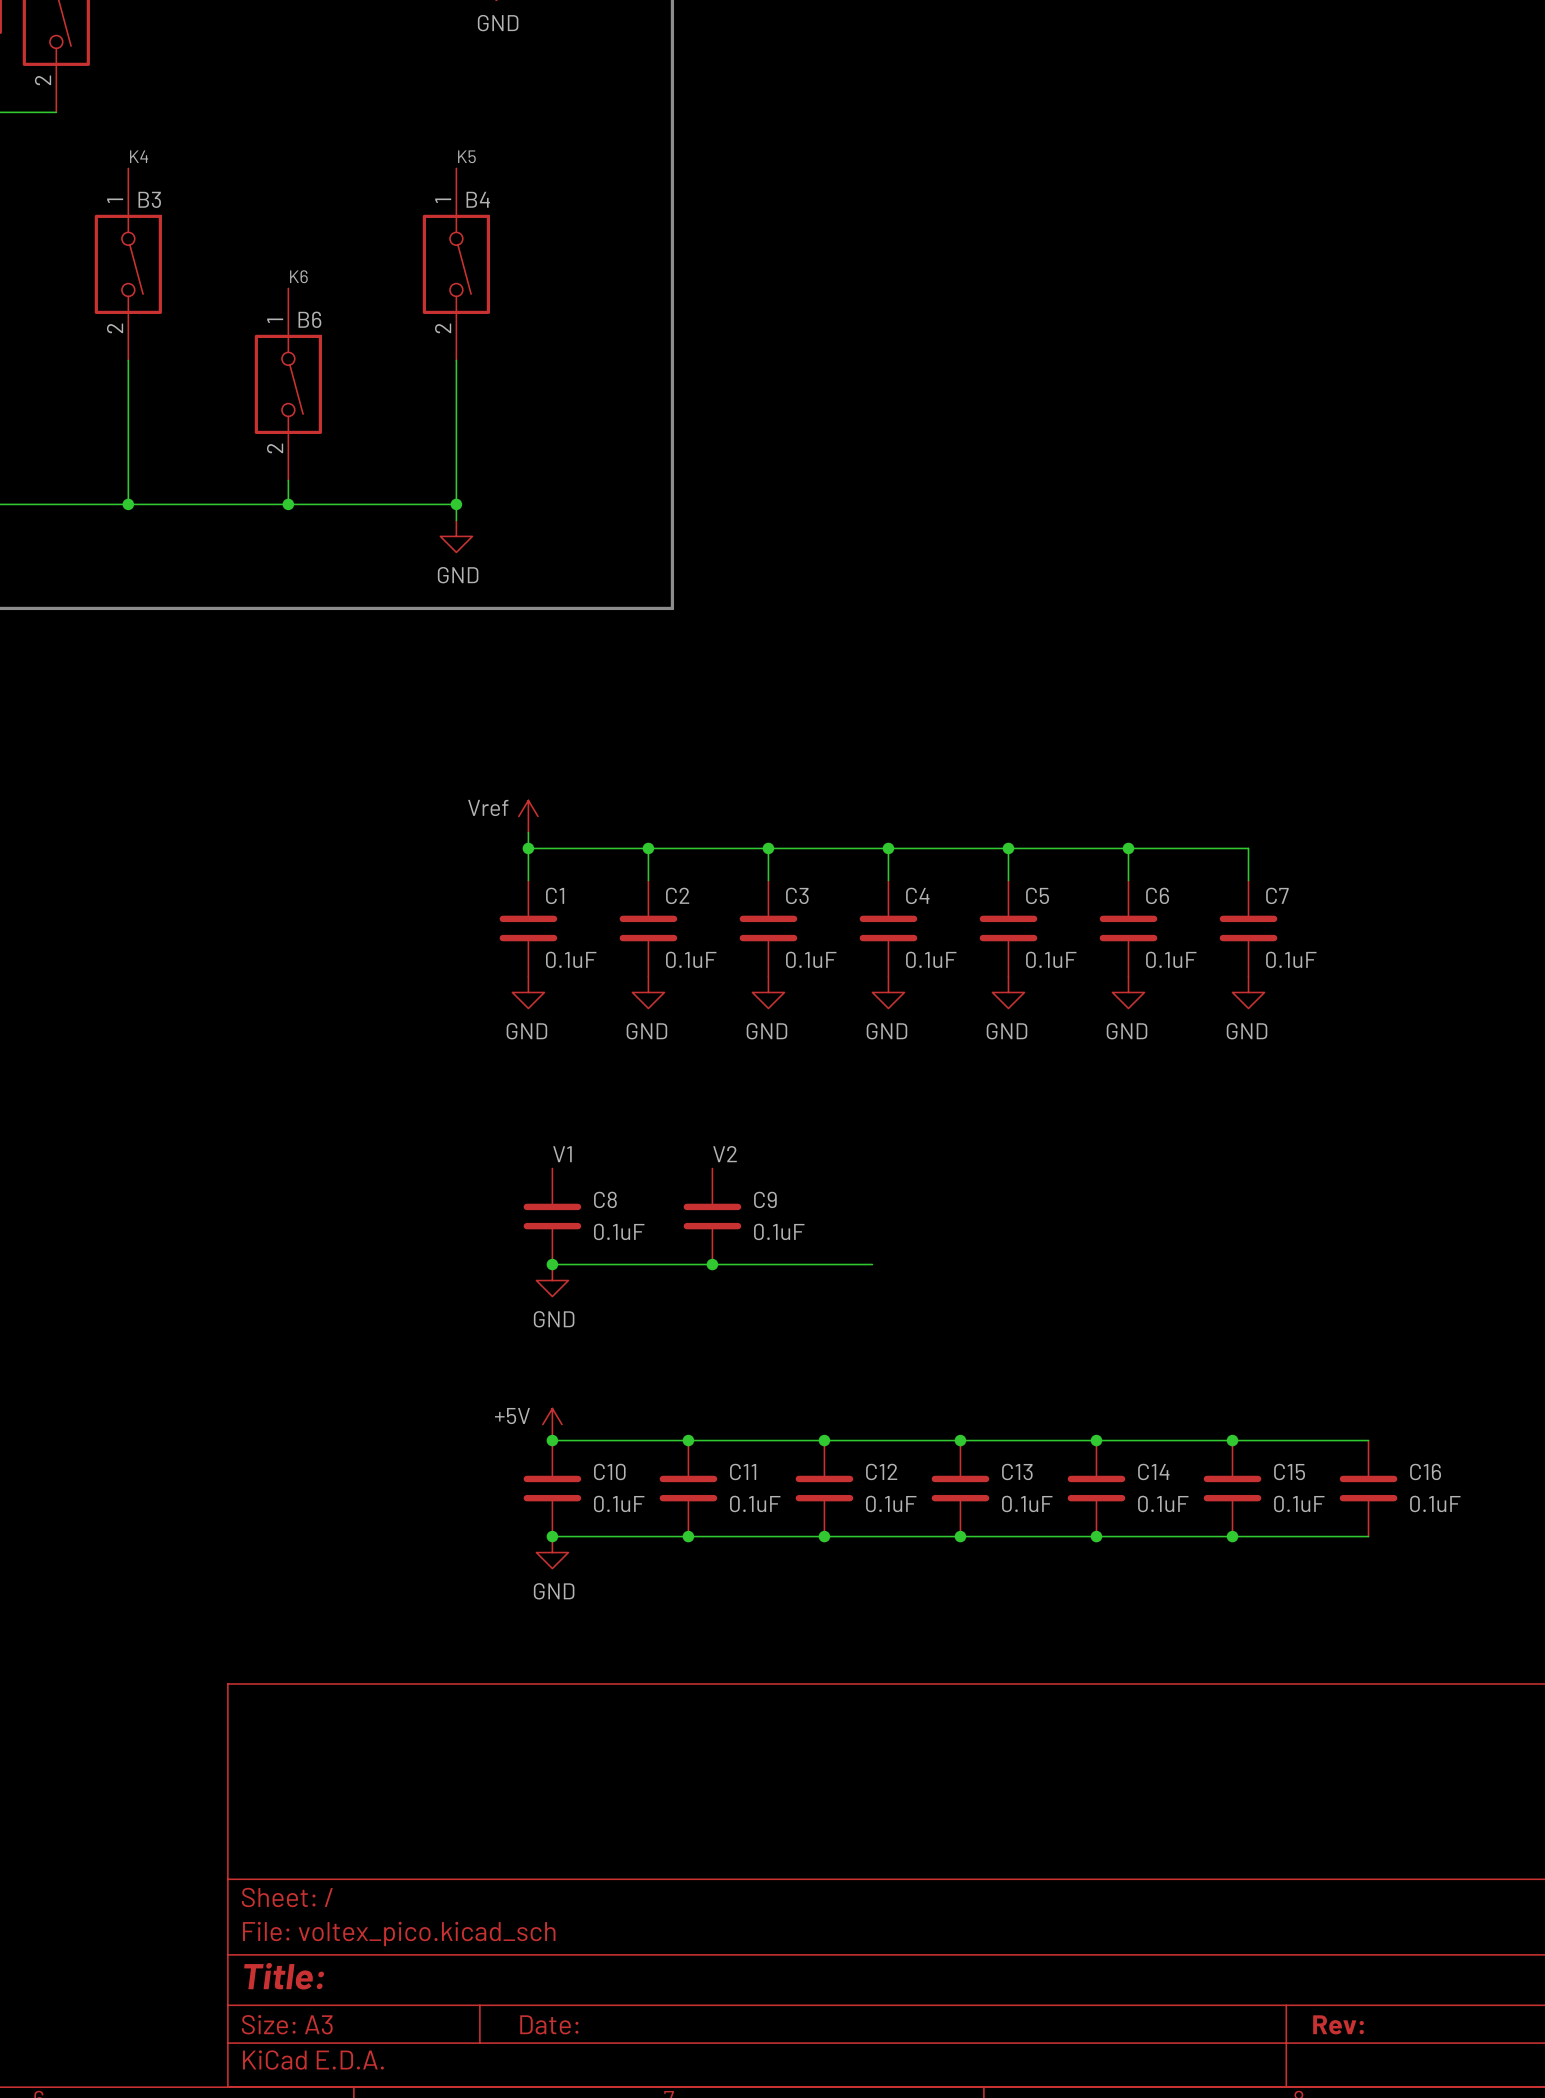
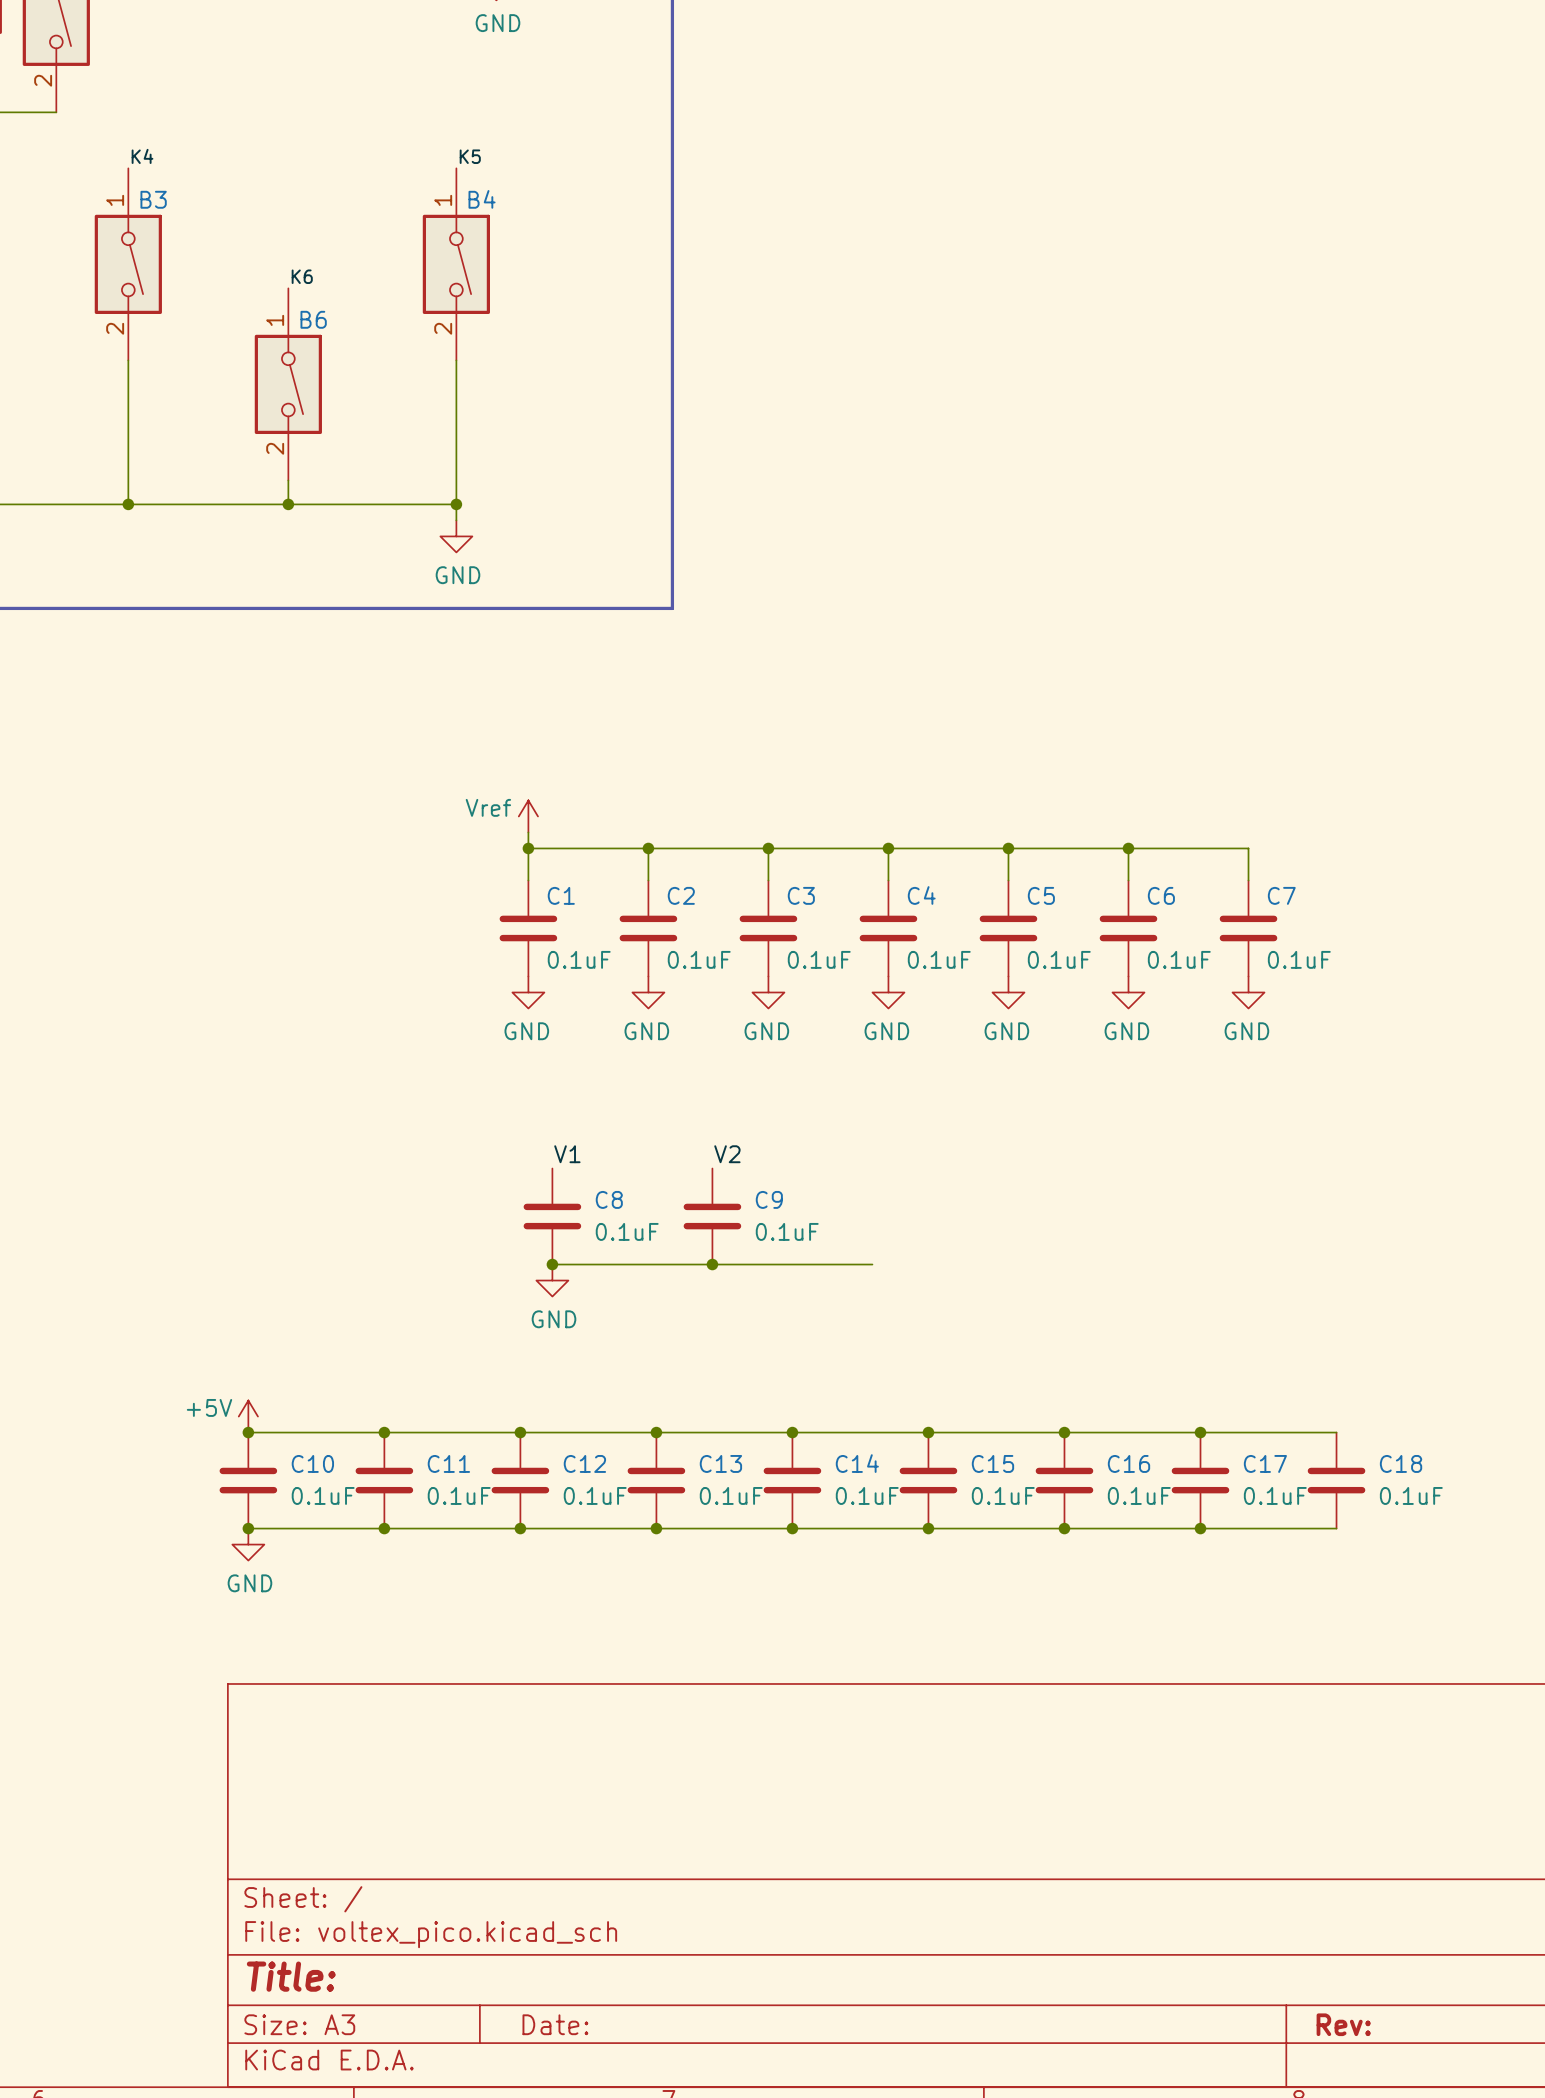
power symbol position: +5V (552, 1424) -> +5V (248, 1416)
wire: none -> (248, 1432) (1336, 1432)
junction: none -> (248, 1432)
junction: none -> (384, 1432)
wire: (552, 1440) (1368, 1440) -> none
junction position: (552, 1440) -> (520, 1432)
junction position: (688, 1440) -> (656, 1432)
junction position: (824, 1440) -> (792, 1432)
junction position: (960, 1440) -> (928, 1432)
junction position: (1096, 1440) -> (1064, 1432)
junction position: (1232, 1440) -> (1200, 1432)
C17: none -> 0.1uF (1200, 1480)
C18: none -> 0.1uF (1336, 1480)
C10 position: (552, 1488) -> (248, 1480)
C11 position: (688, 1488) -> (384, 1480)
C12 position: (824, 1488) -> (520, 1480)
C13 position: (960, 1488) -> (656, 1480)
C14 position: (1096, 1488) -> (792, 1480)
C15 position: (1232, 1488) -> (928, 1480)
C16 position: (1368, 1488) -> (1064, 1480)
wire: none -> (248, 1528) (1336, 1528)
junction: none -> (248, 1528)
junction: none -> (384, 1528)
wire: (552, 1536) (1368, 1536) -> none
junction position: (552, 1536) -> (520, 1528)
junction position: (688, 1536) -> (656, 1528)
junction position: (824, 1536) -> (792, 1528)
junction position: (960, 1536) -> (928, 1528)
junction position: (1096, 1536) -> (1064, 1528)
junction position: (1232, 1536) -> (1200, 1528)
power symbol position: GND (552, 1552) -> GND (248, 1544)

